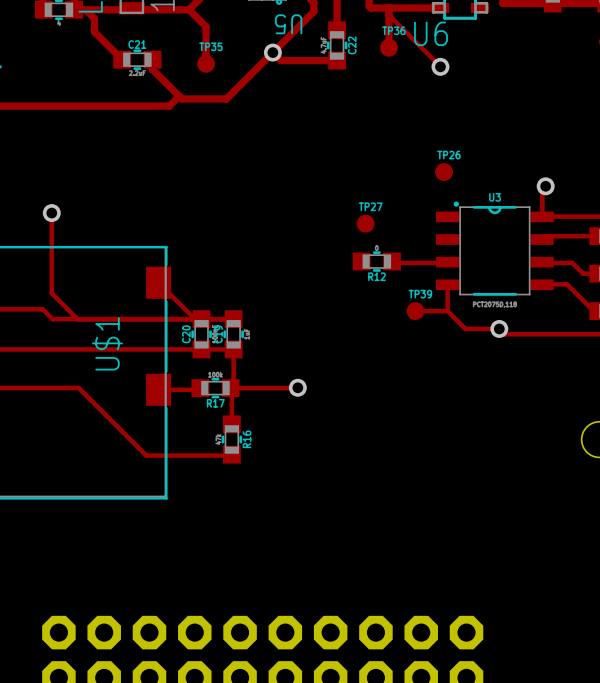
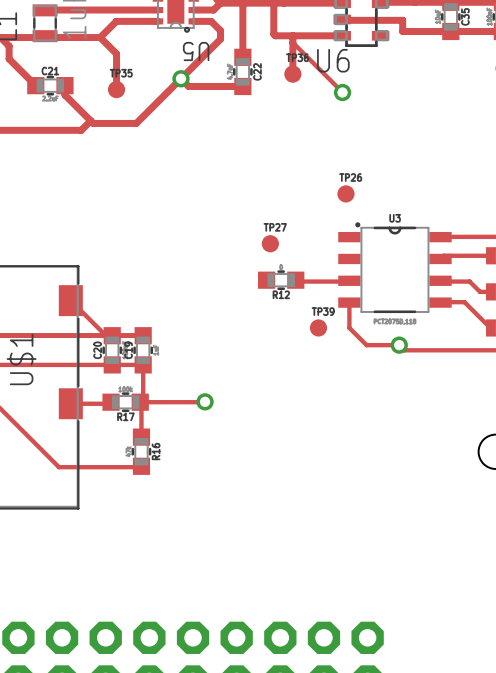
track: (545, 186) (542, 189) (542, 216) -> none
via: (545, 186) -> none
track: (415, 311) (447, 311) -> none

